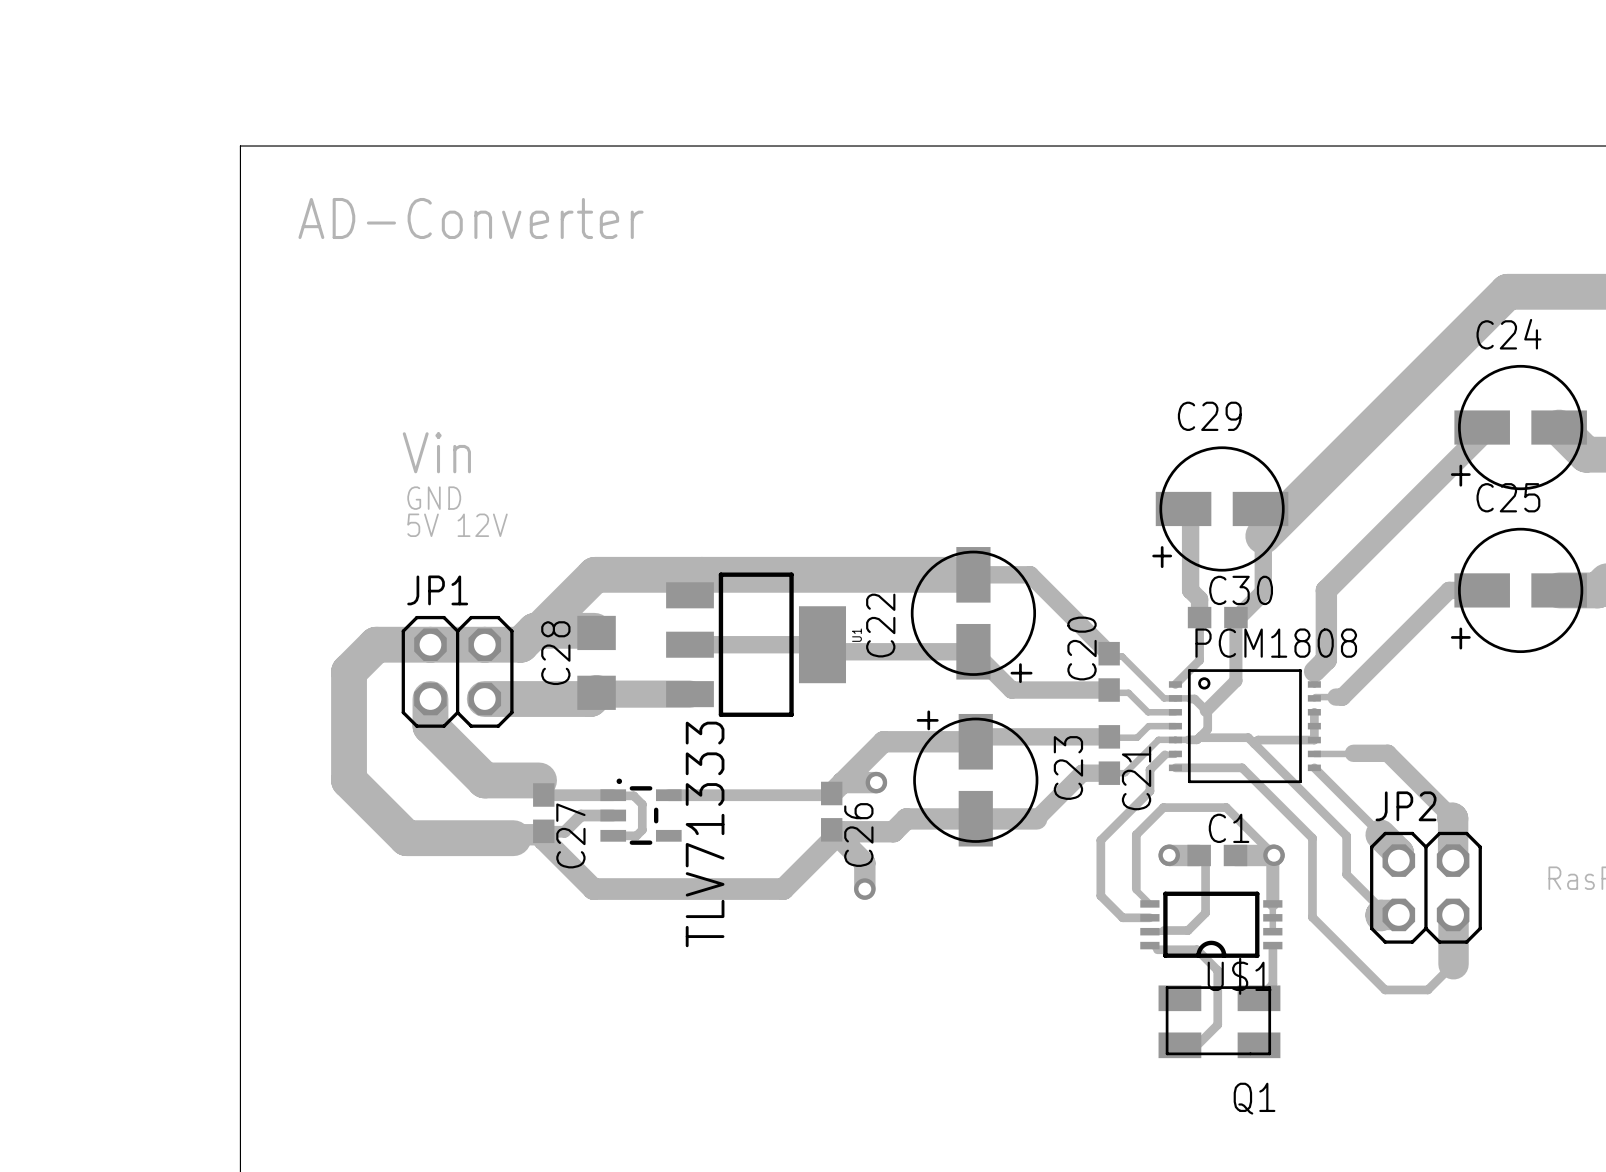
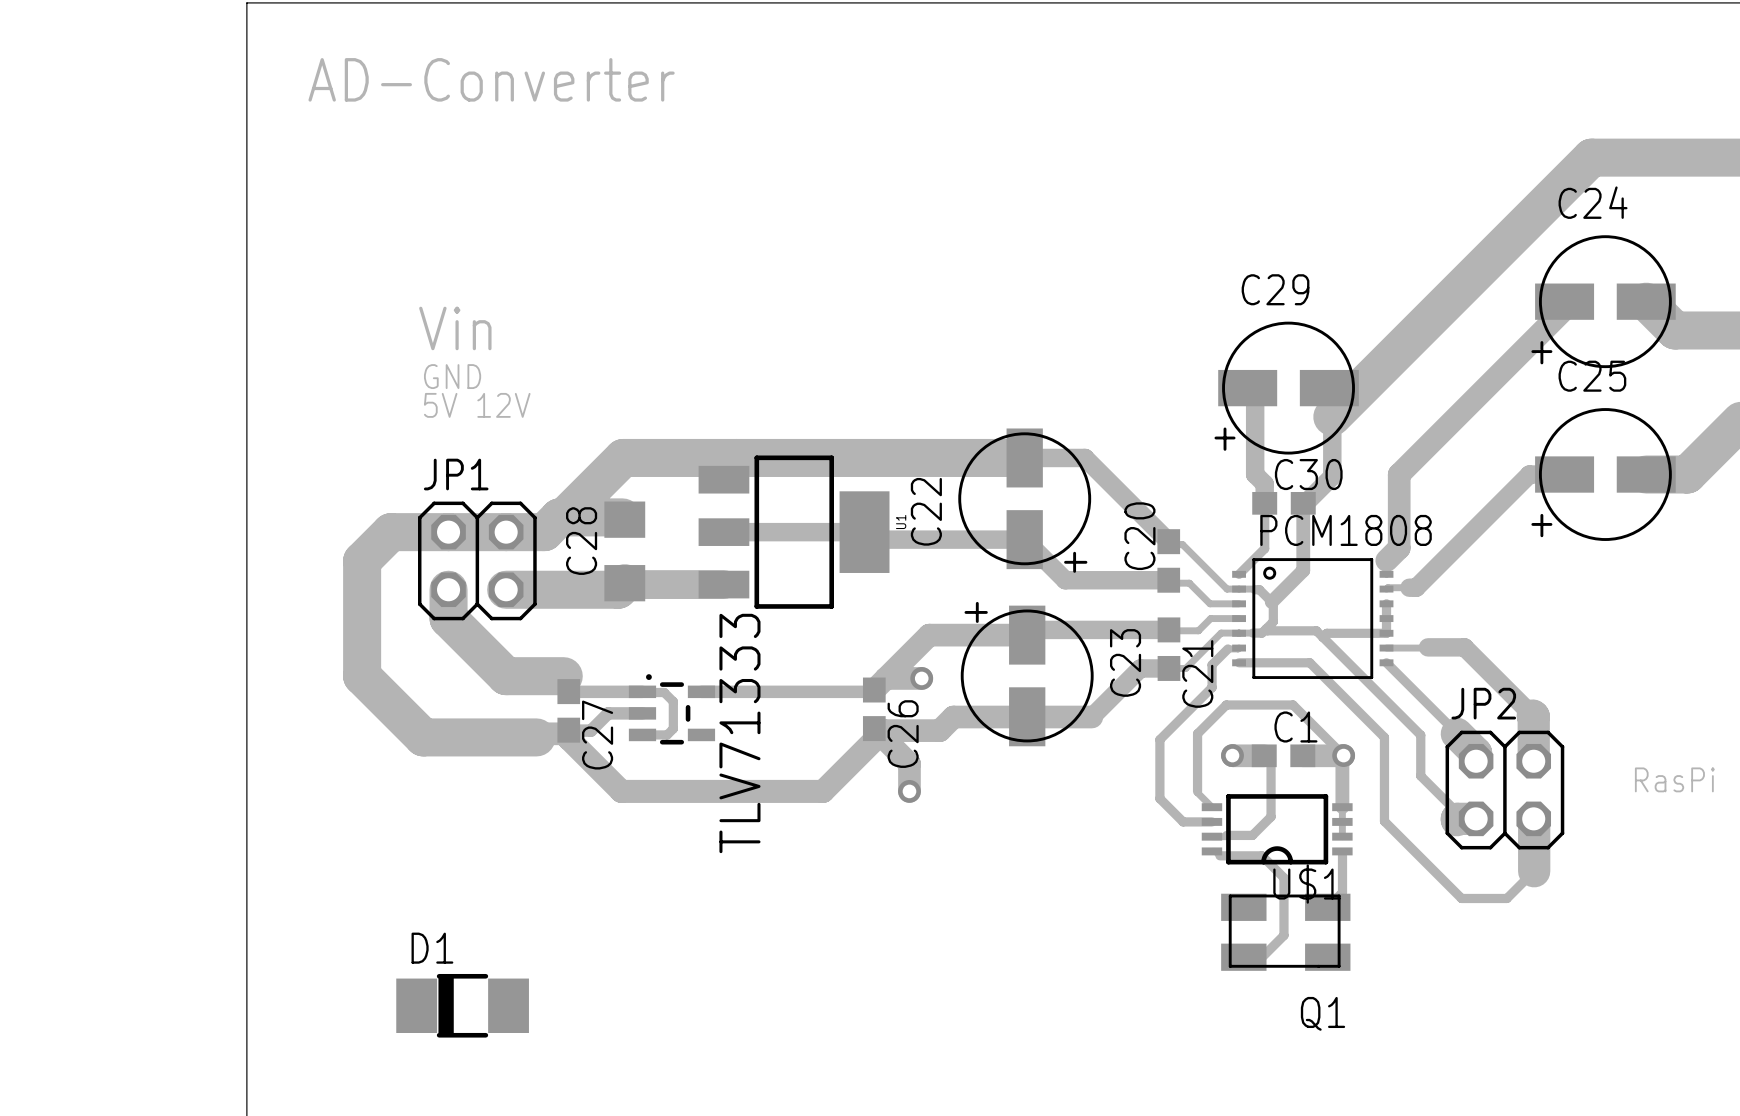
D1: none -> (462, 1005)

